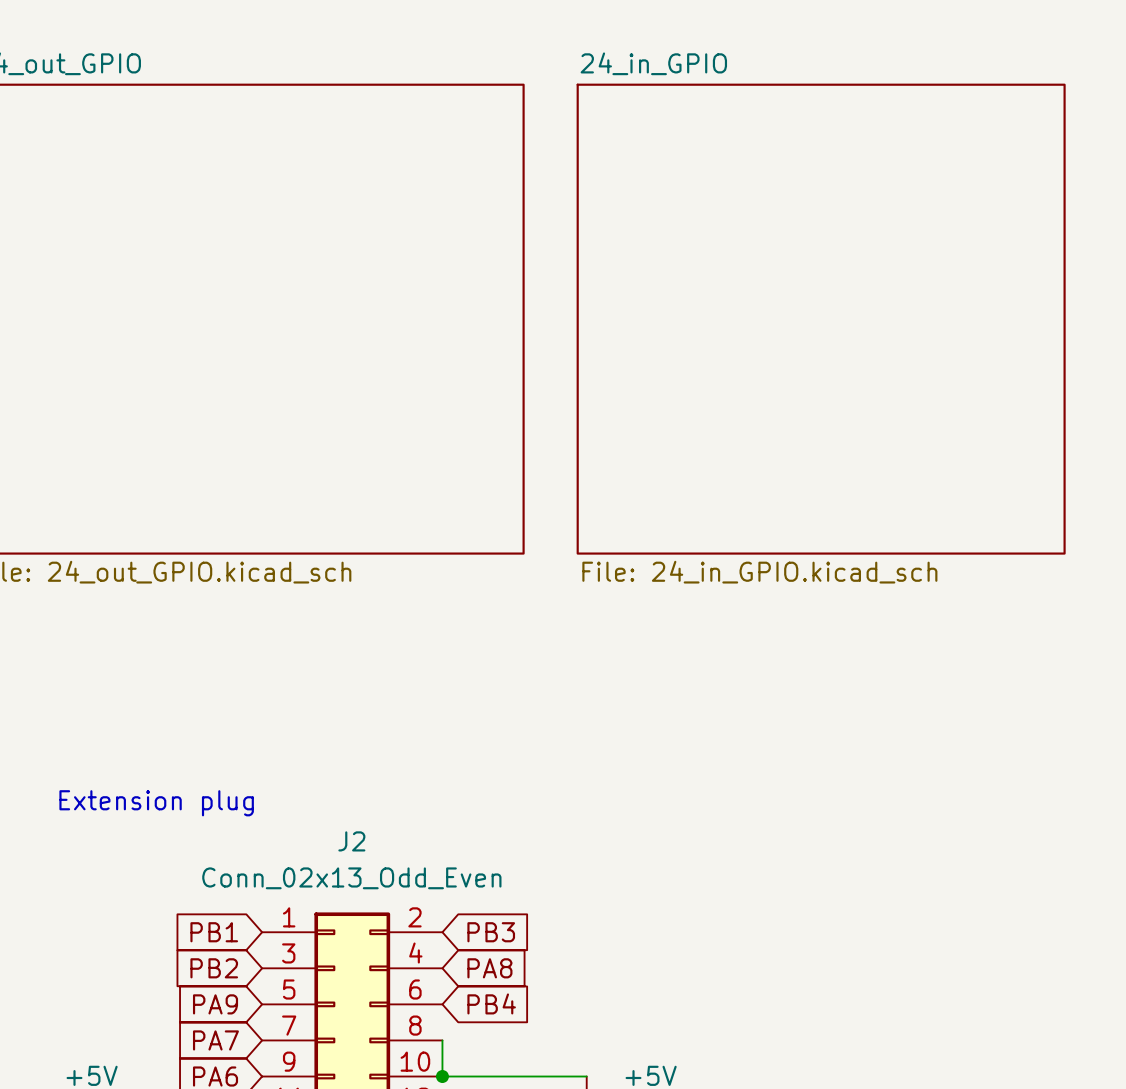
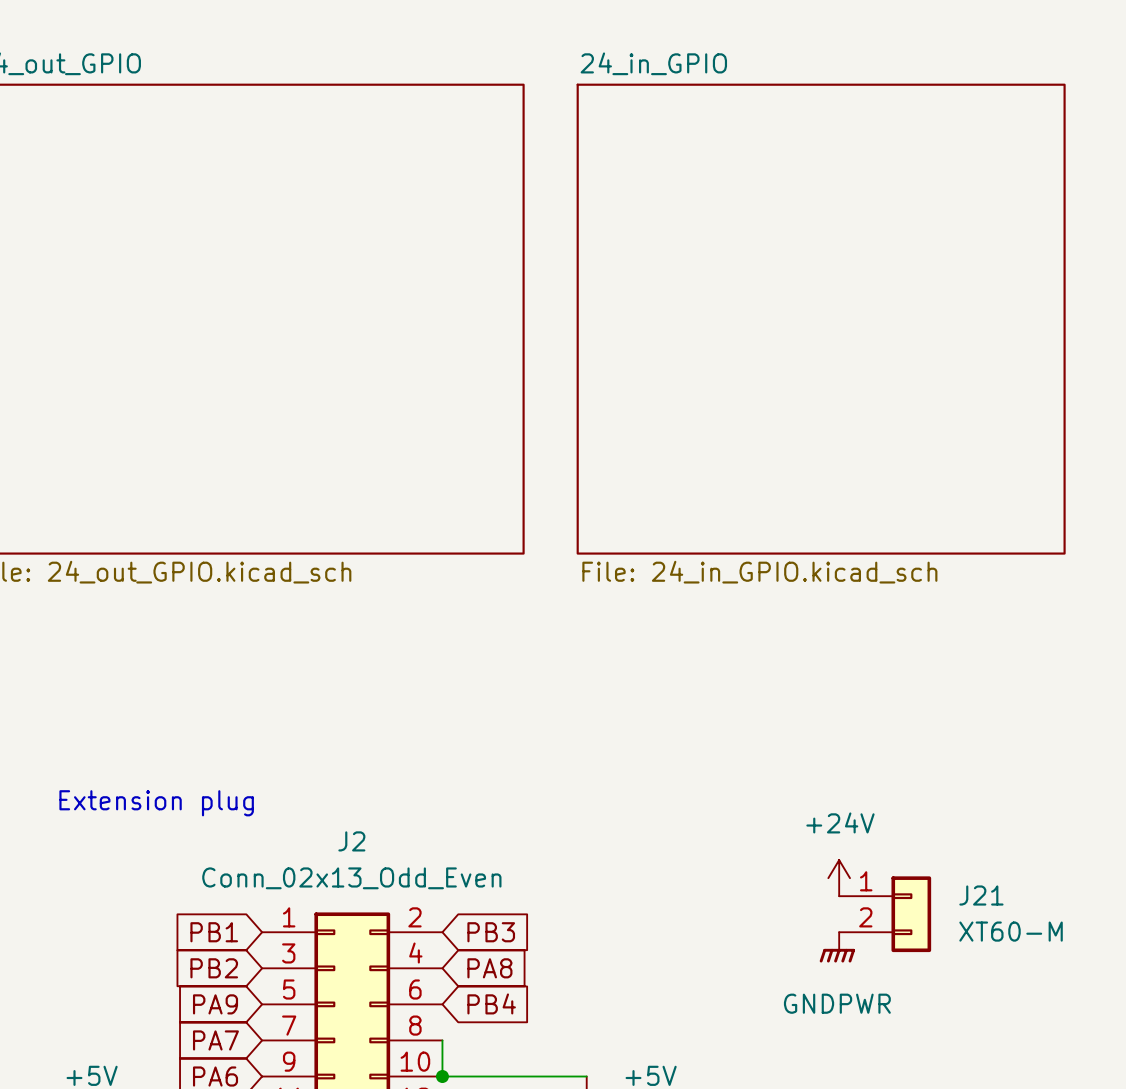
power symbol: none -> +24V (839, 878)
J21: none -> XT60-M (885, 914)
power symbol: none -> GNDPWR (837, 947)

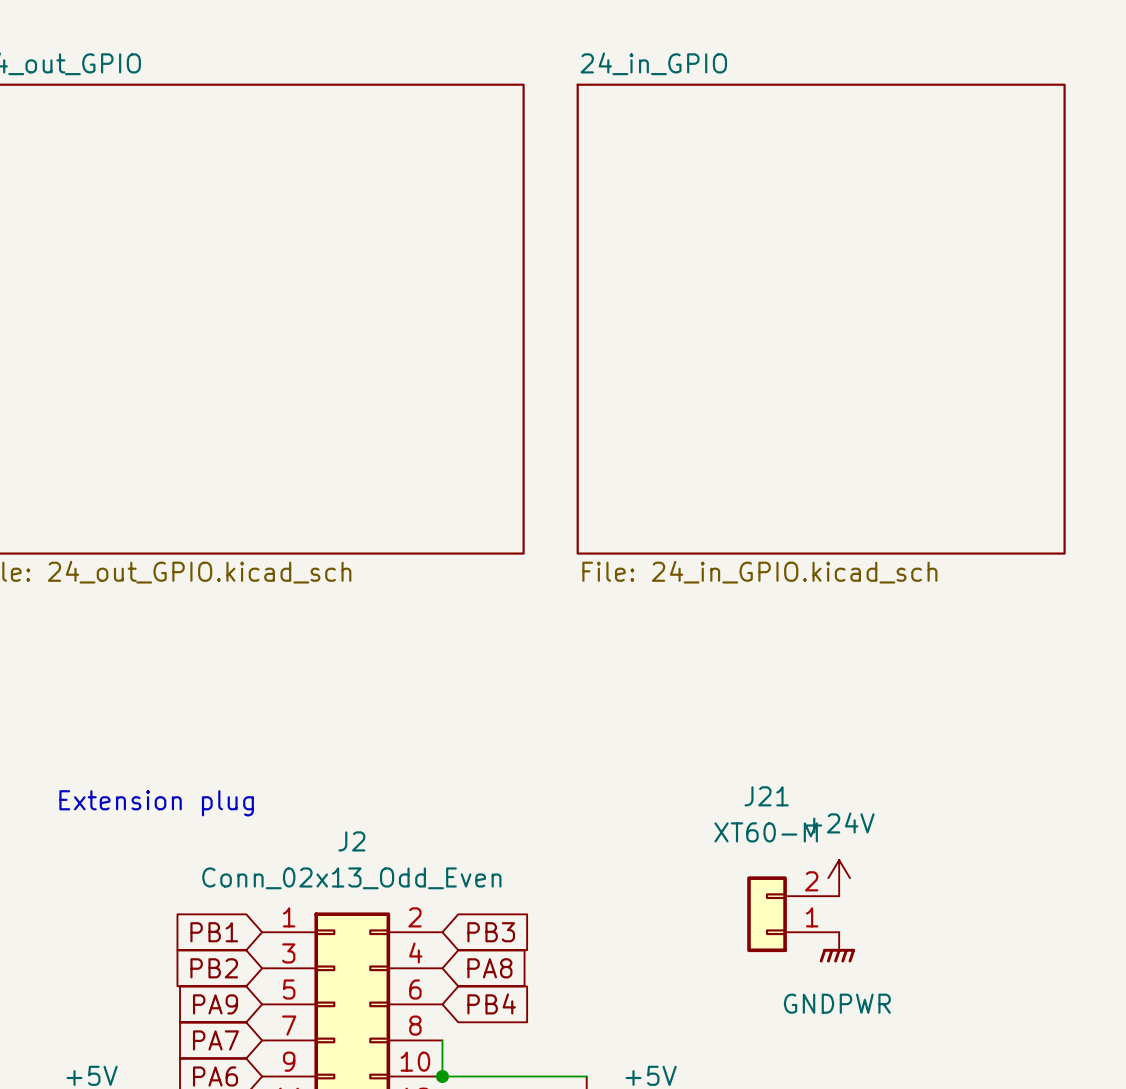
J21 name position: J21 (981, 895) -> J21 (766, 796)
J21 position: (885, 914) -> (793, 914)
J21 rotation: 0° (911, 914) -> 180° (767, 914)
J21 value position: XT60-M (1011, 931) -> XT60-M (766, 832)

